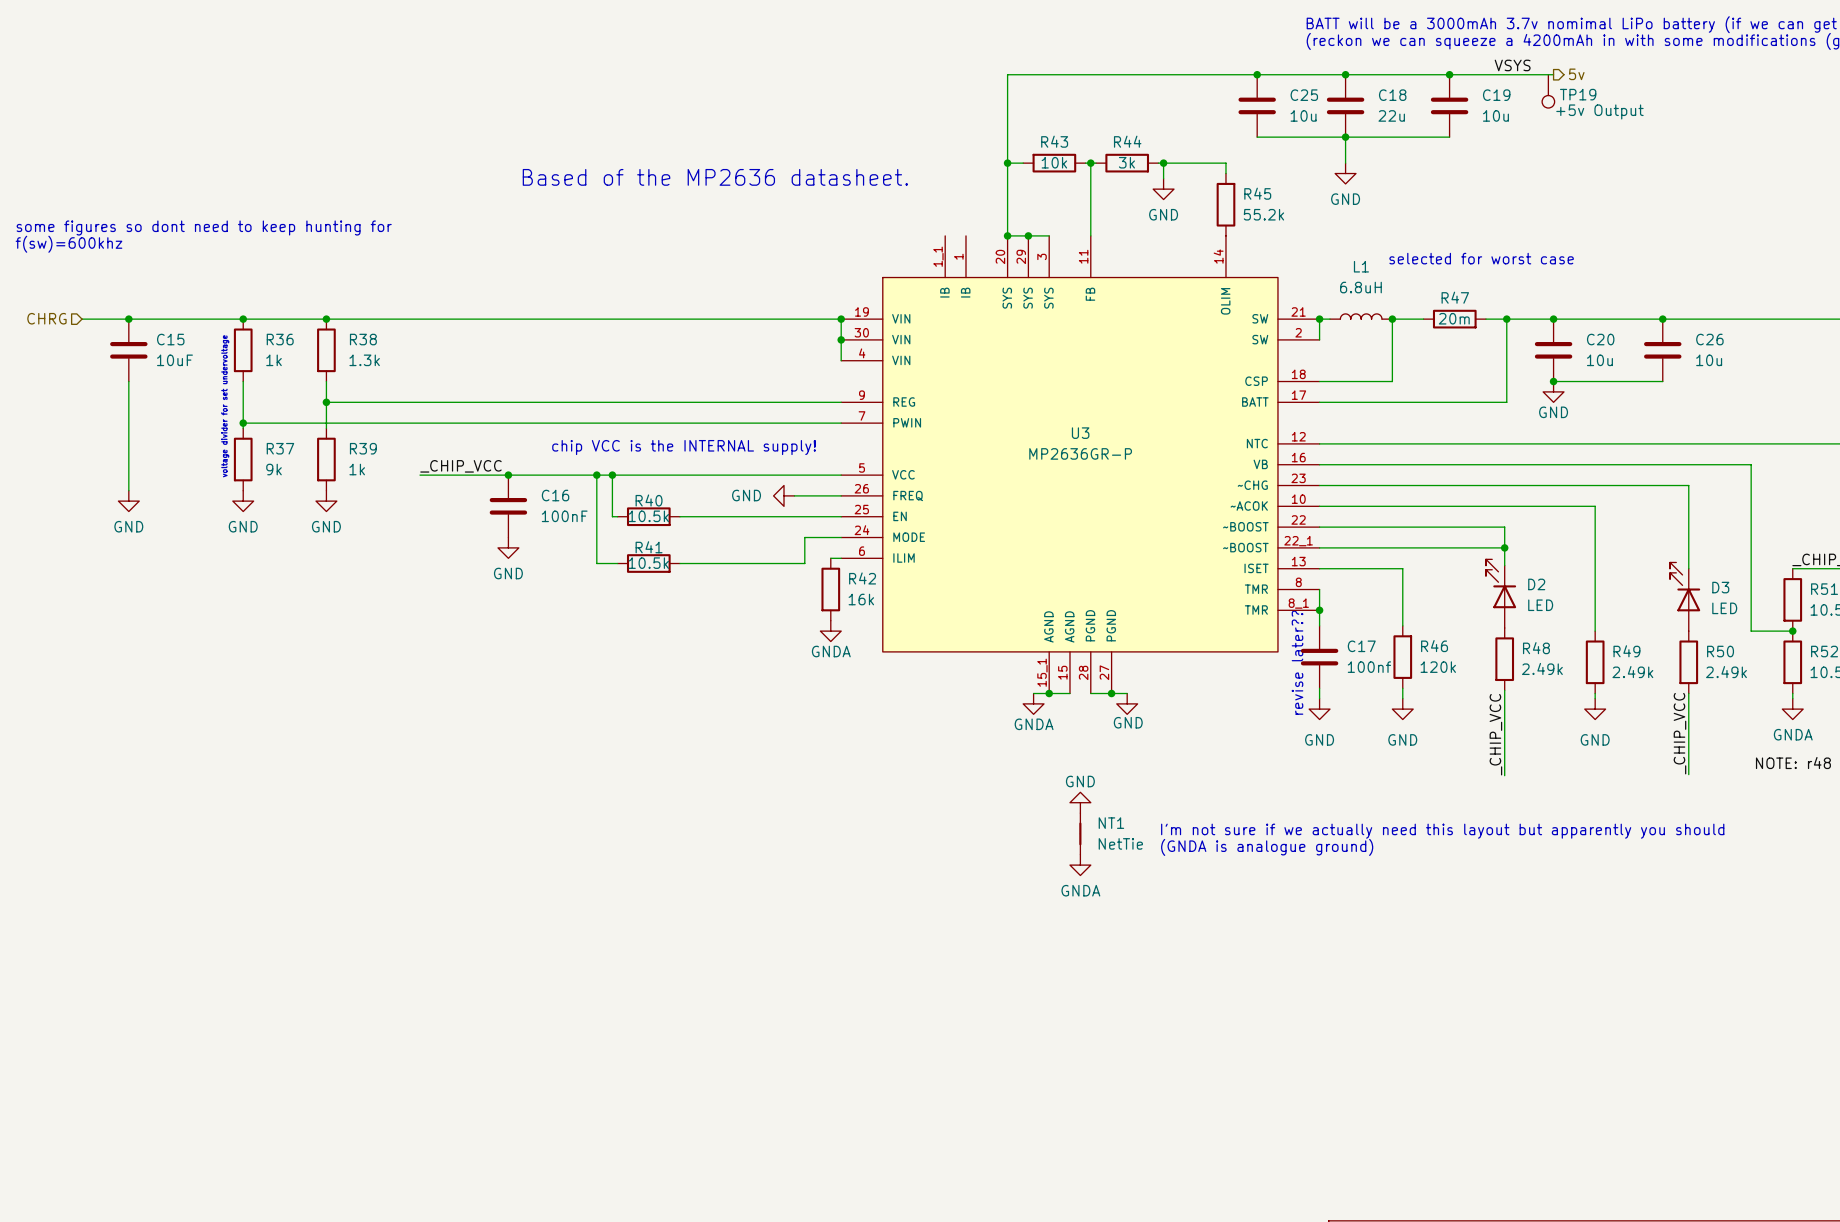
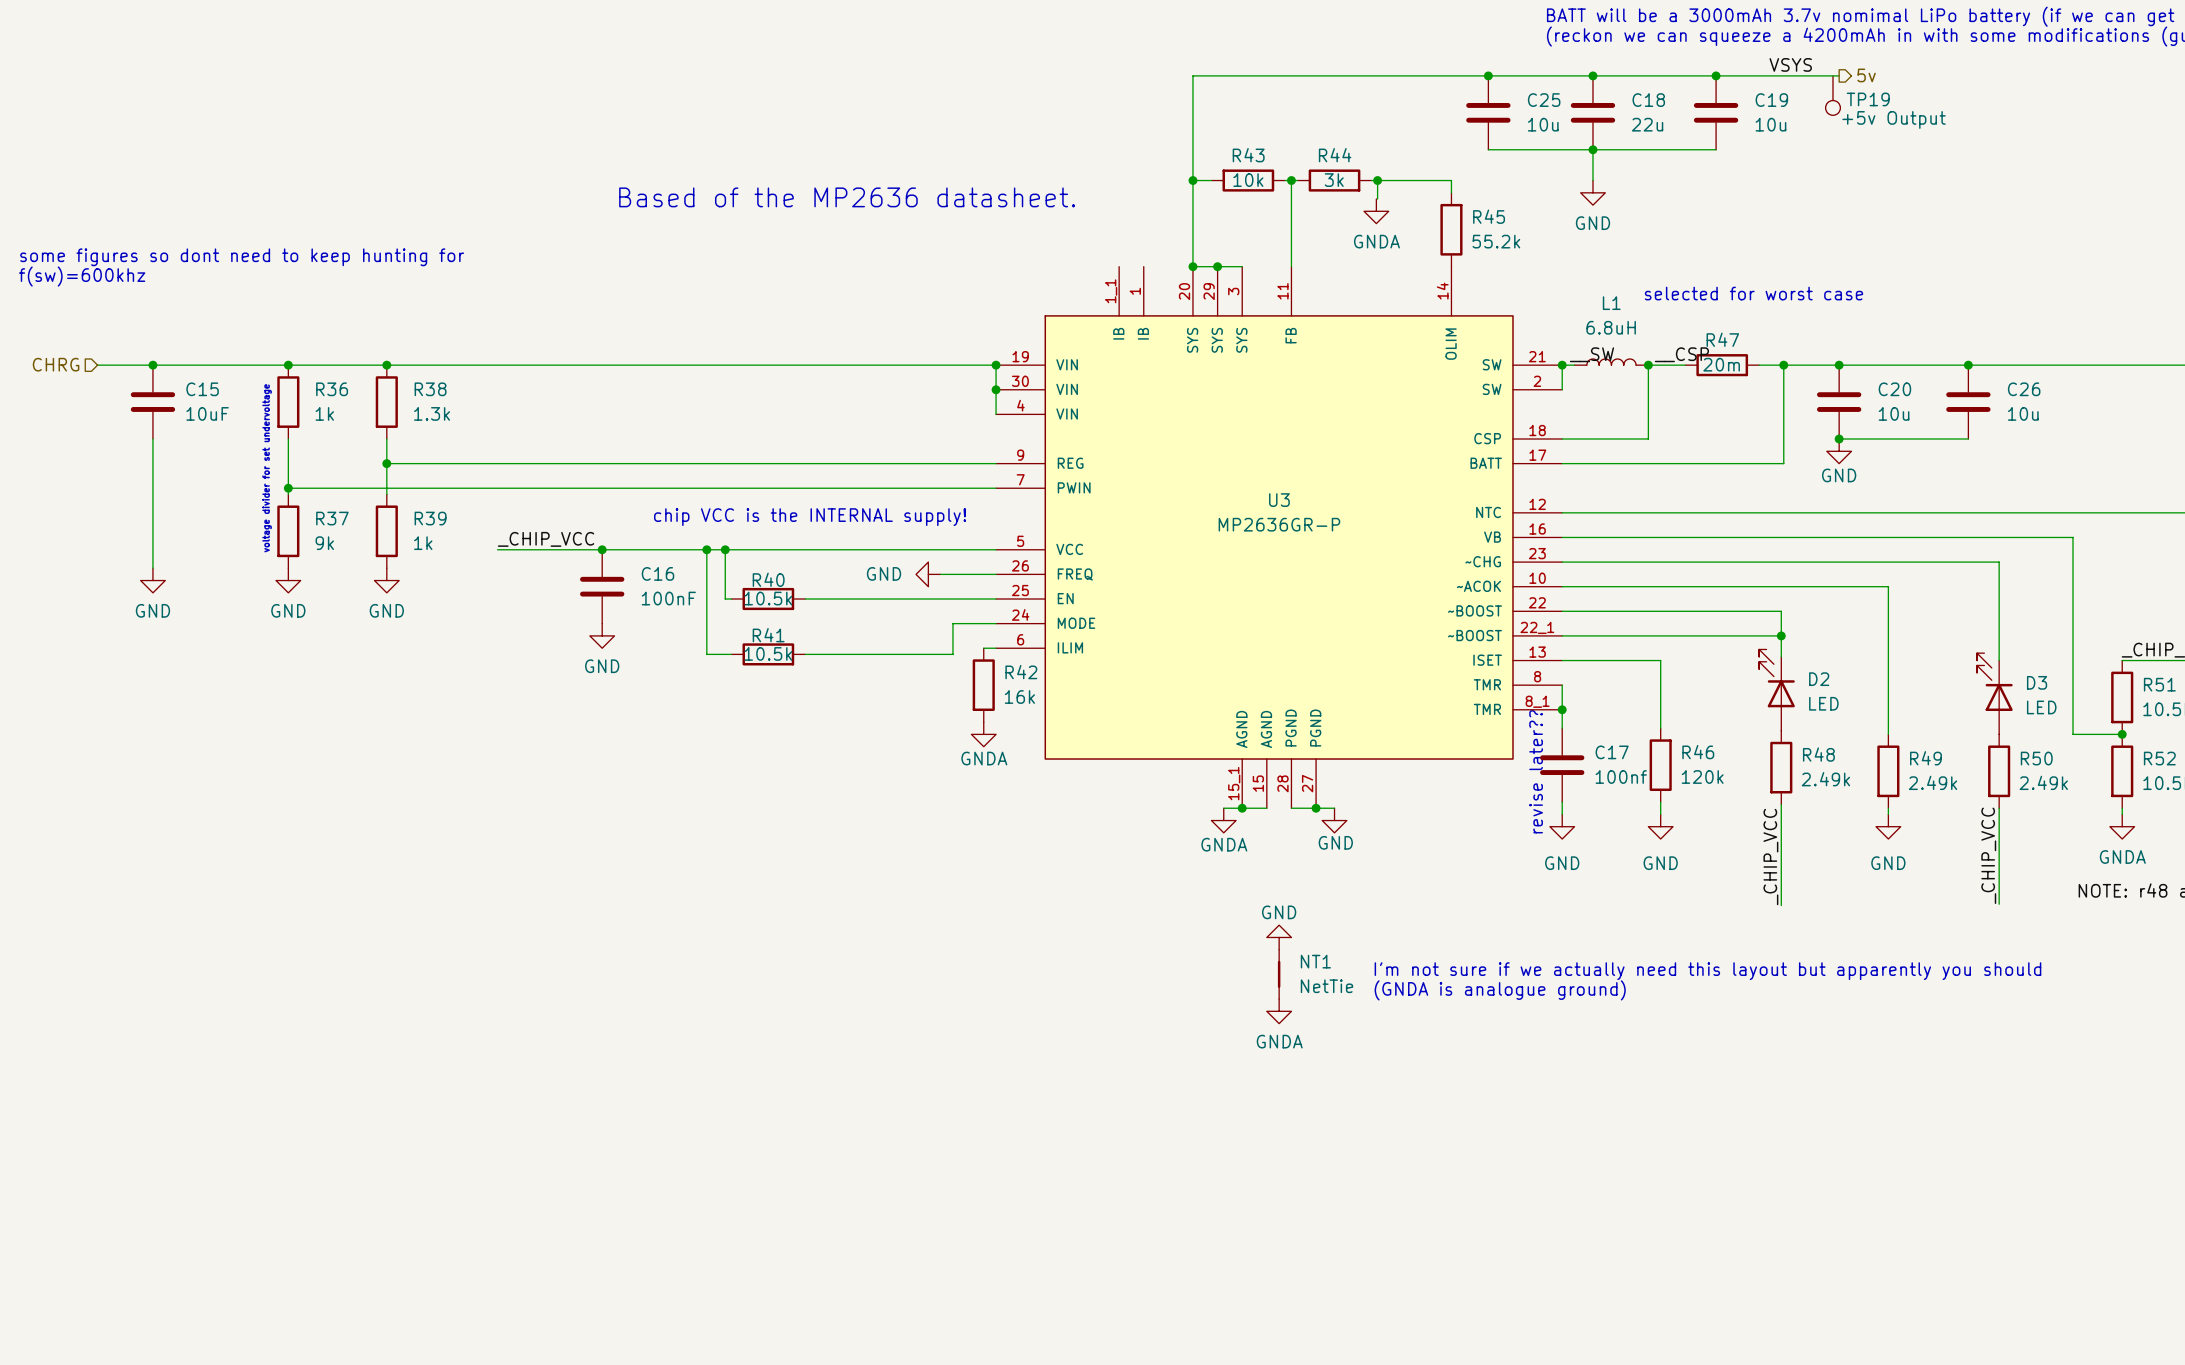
power symbol: GND (1163, 189) -> GNDA (1376, 211)
label: none -> __SW (1591, 354)
label: none -> __CSP (1681, 354)

